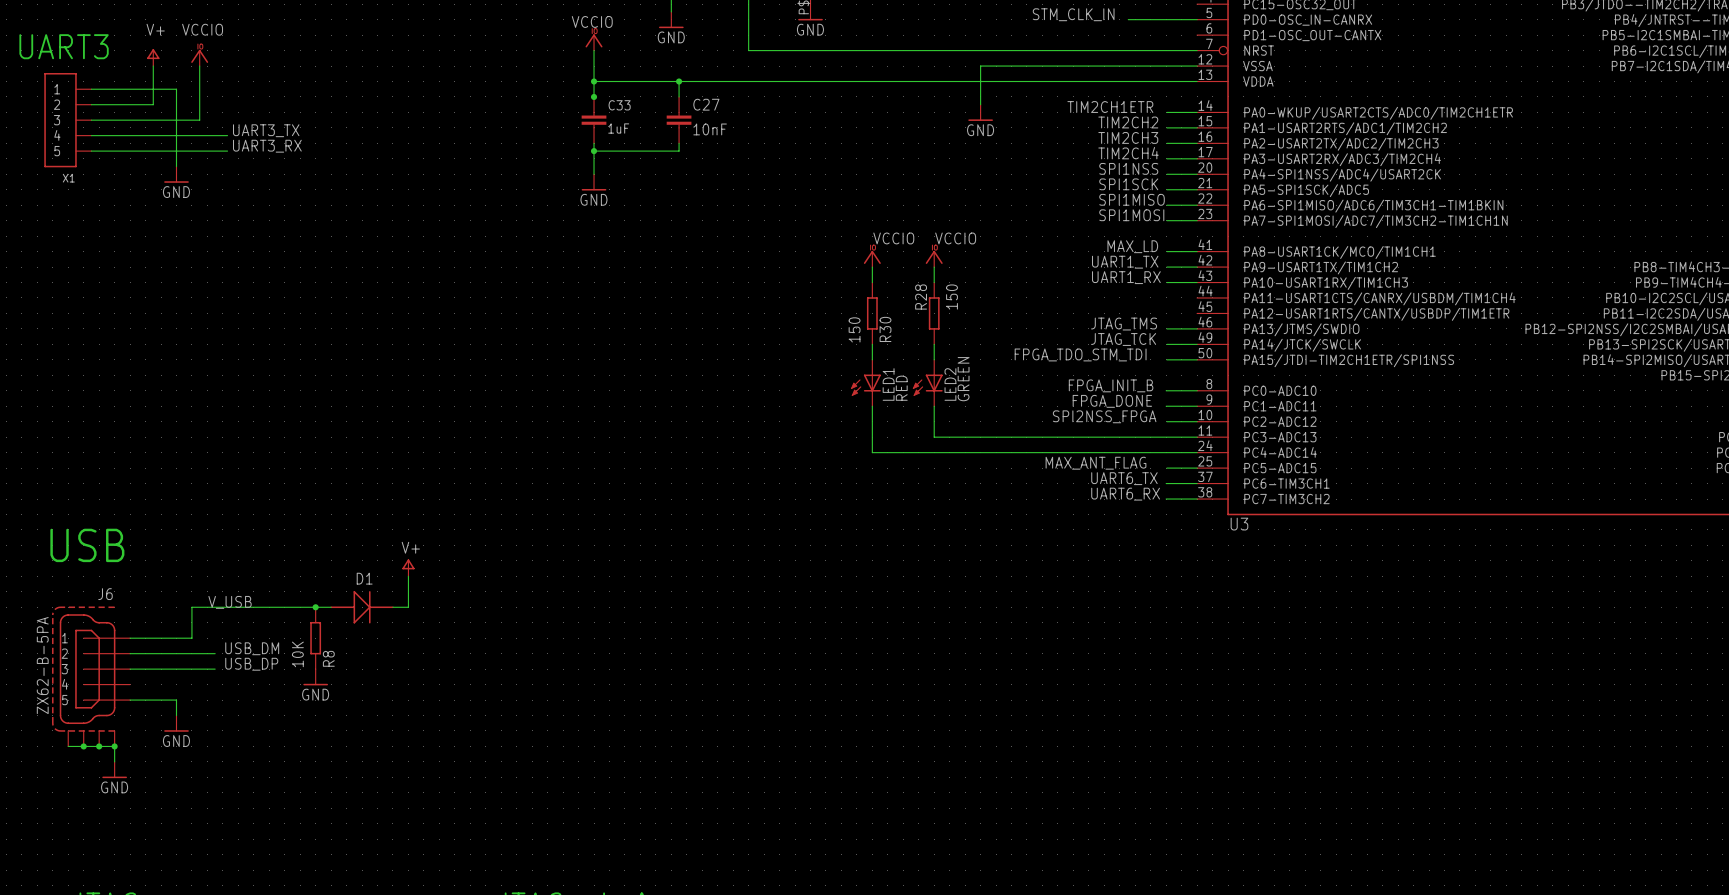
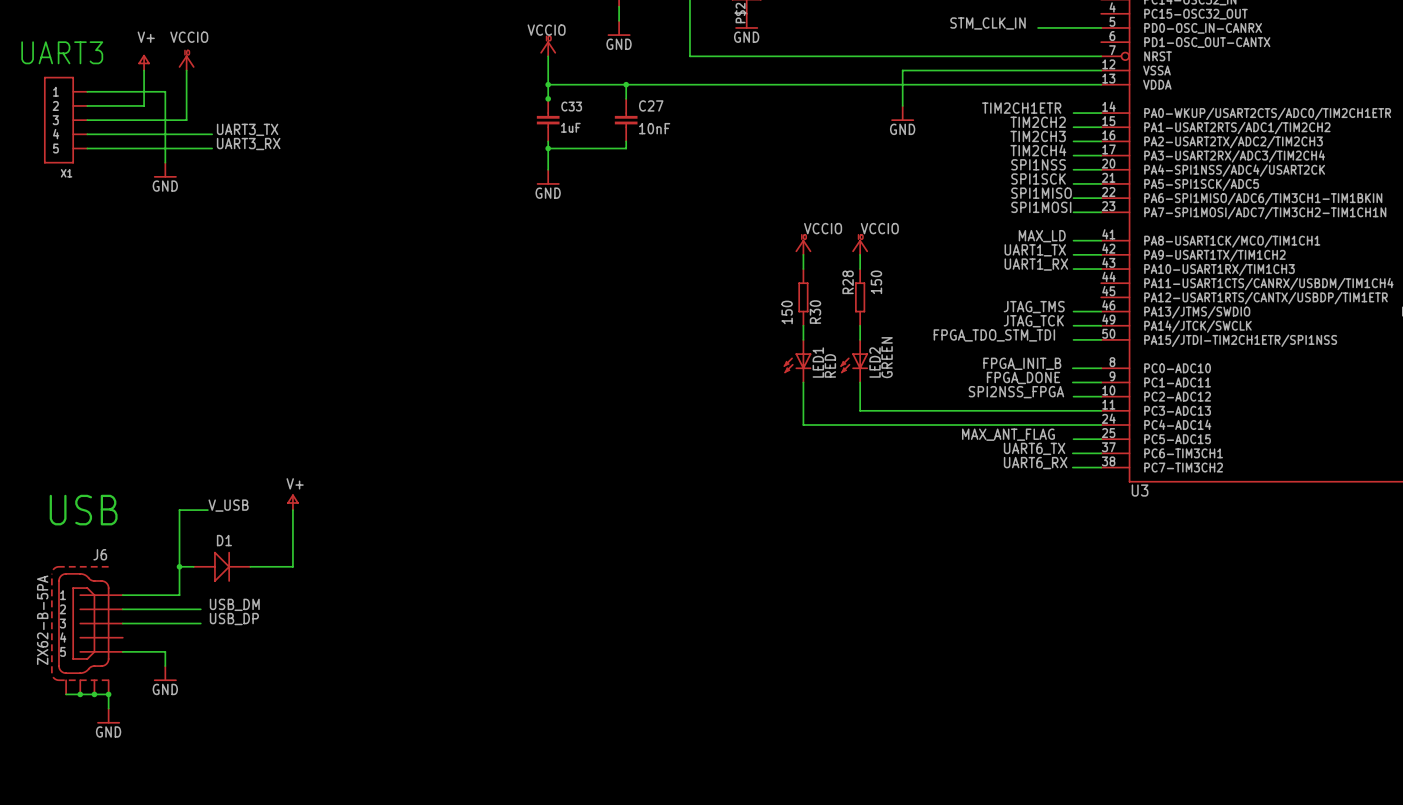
wire: none -> (207, 510) (179, 510) (179, 566)
power symbol position: V+ (408, 567) -> V+ (292, 502)
wire: (408, 576) (408, 607) (392, 607) -> none
label position: V_USB (230, 602) -> V_USB (228, 505)
junction: none -> (179, 566)
wire: (315, 607) (331, 607) -> (292, 566) (292, 510)
junction: (315, 607) -> none
D1 position: (362, 607) -> (222, 566)
R8: 10K (315, 638) -> none
power symbol: GND (315, 677) -> none

